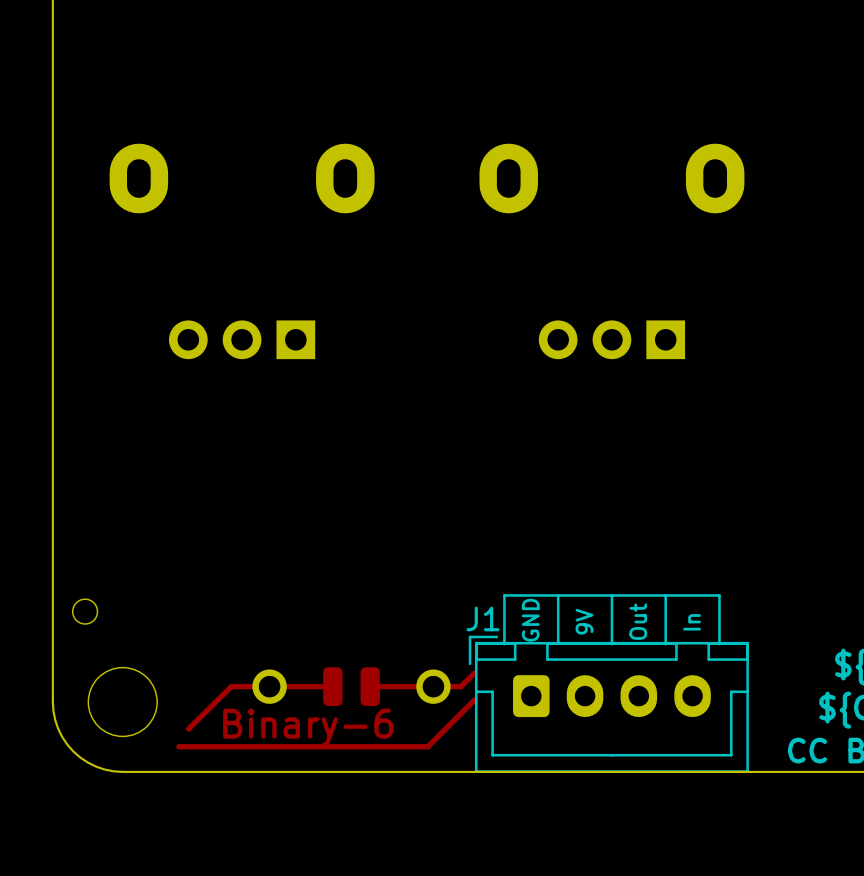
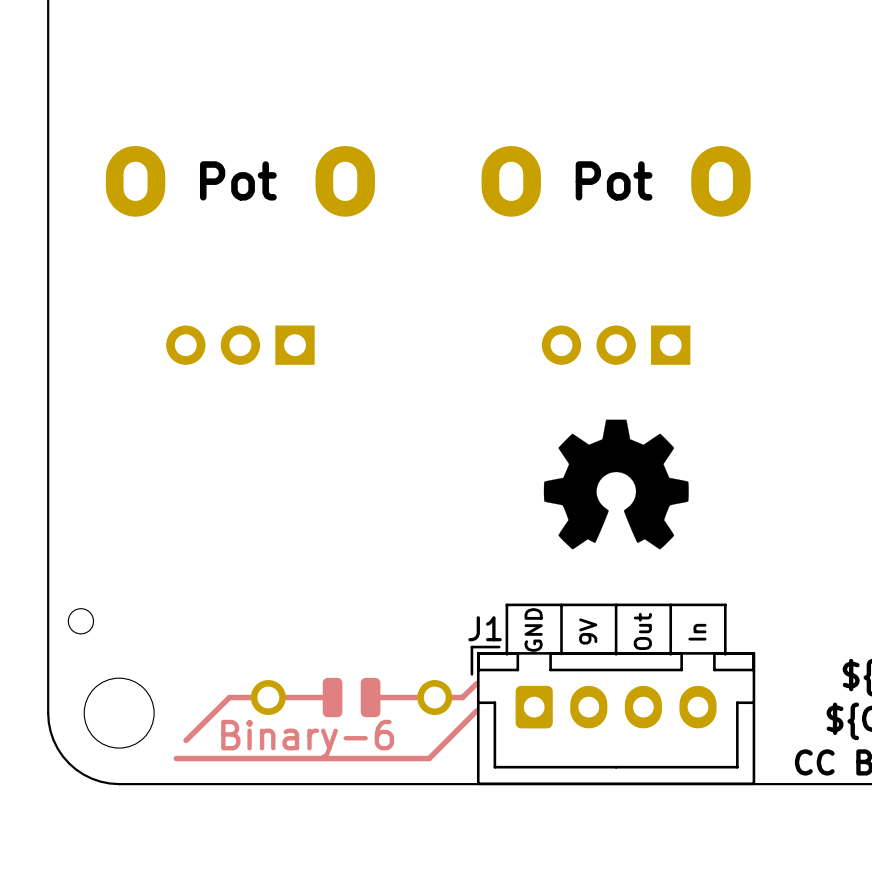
text: none -> Pot (238, 180)
text: none -> Pot (614, 180)
drawing: none -> [543, 419, 689, 550]

